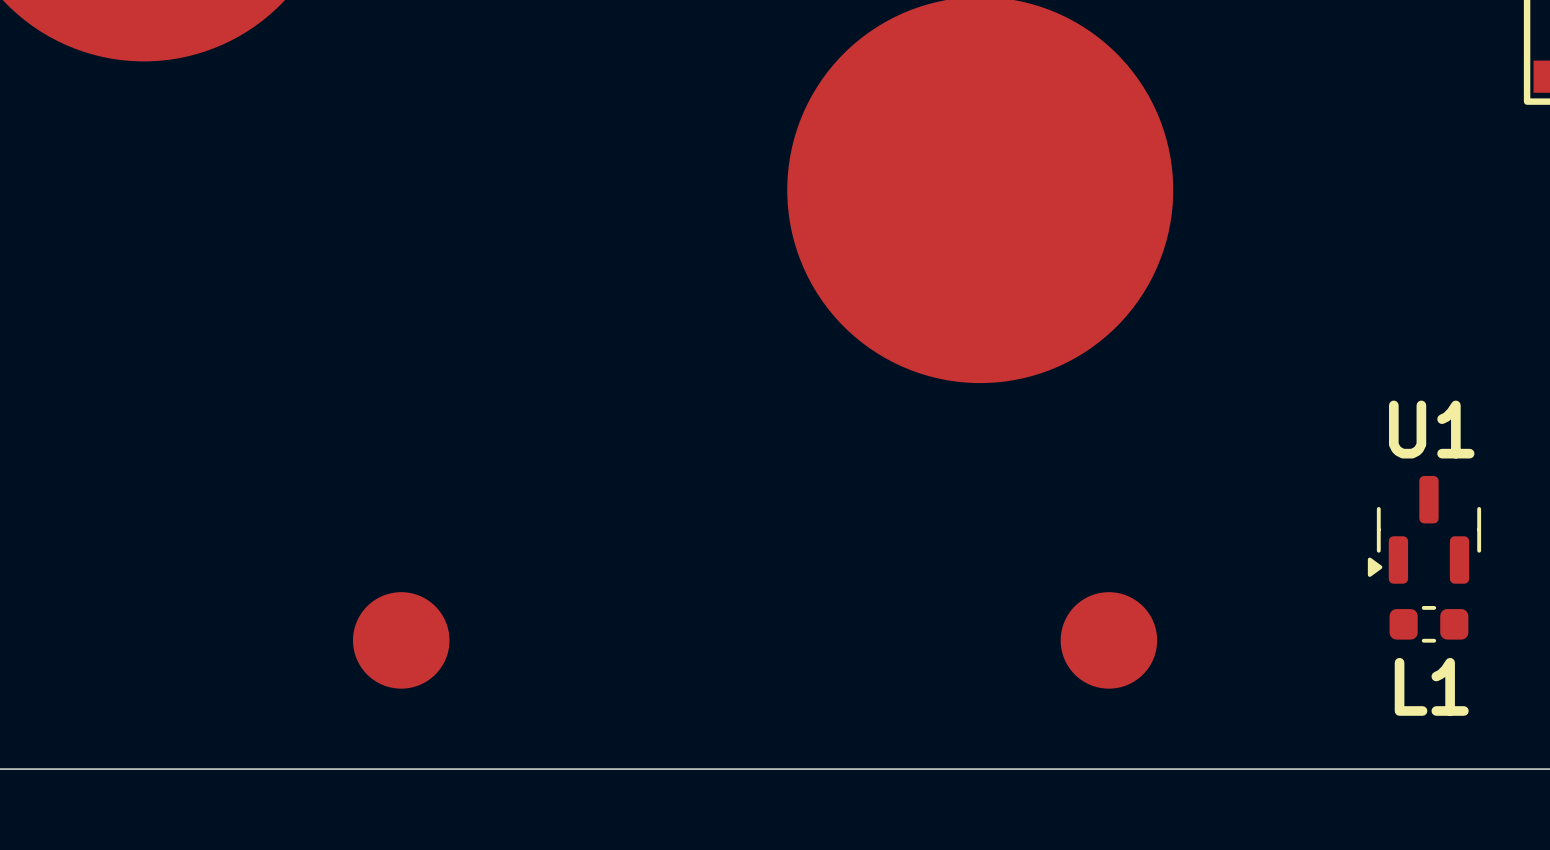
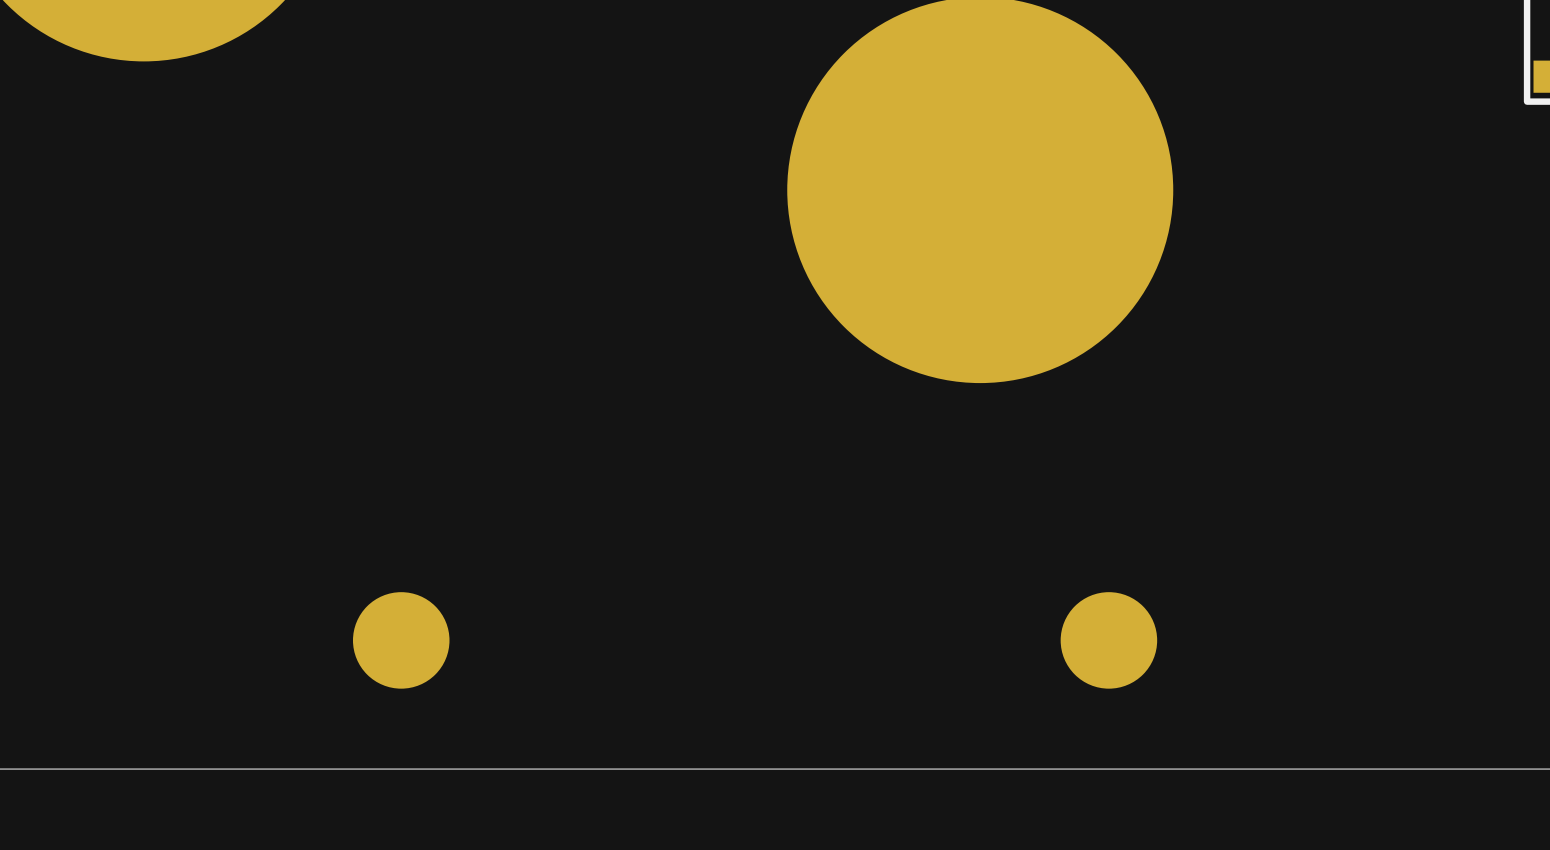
U1: (1424, 529) -> none
L1: (1428, 624) -> none

